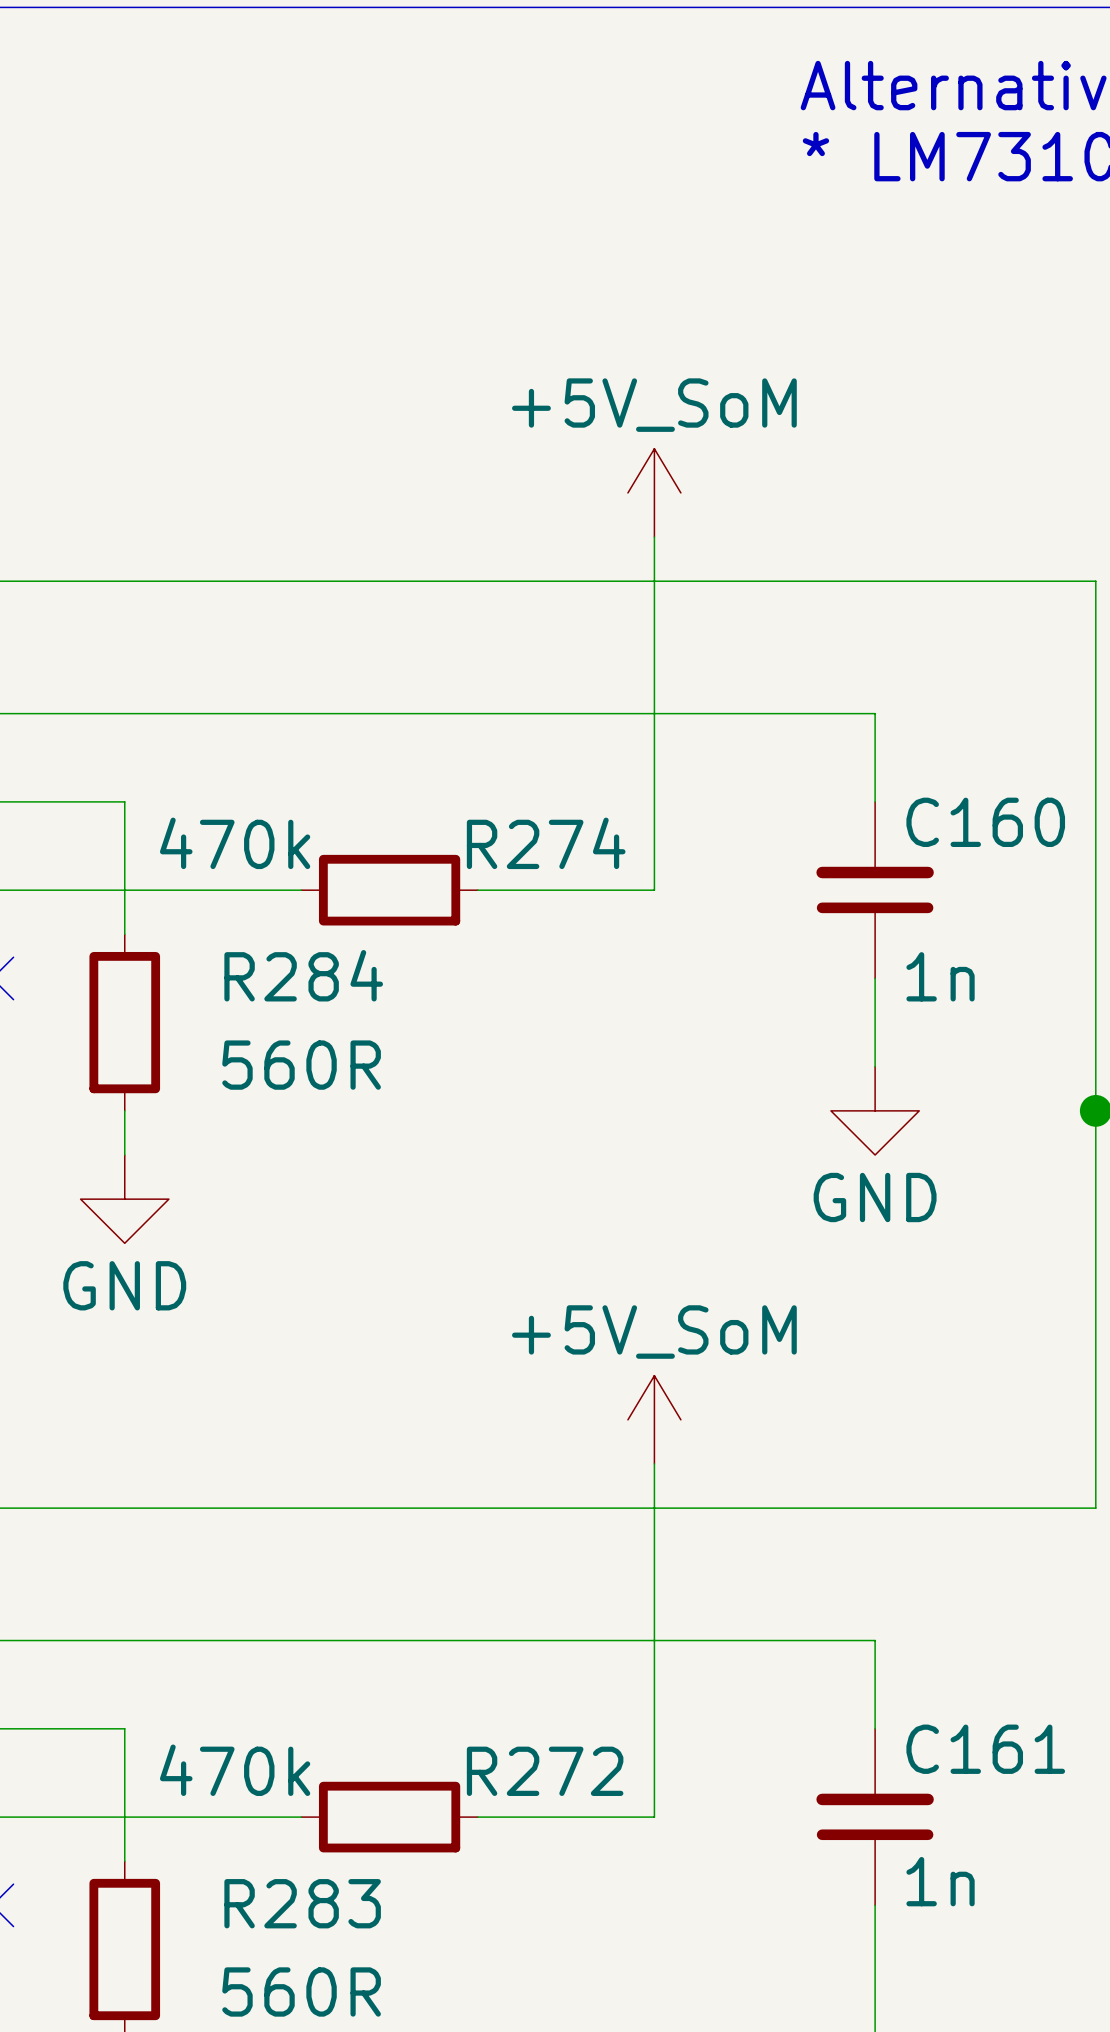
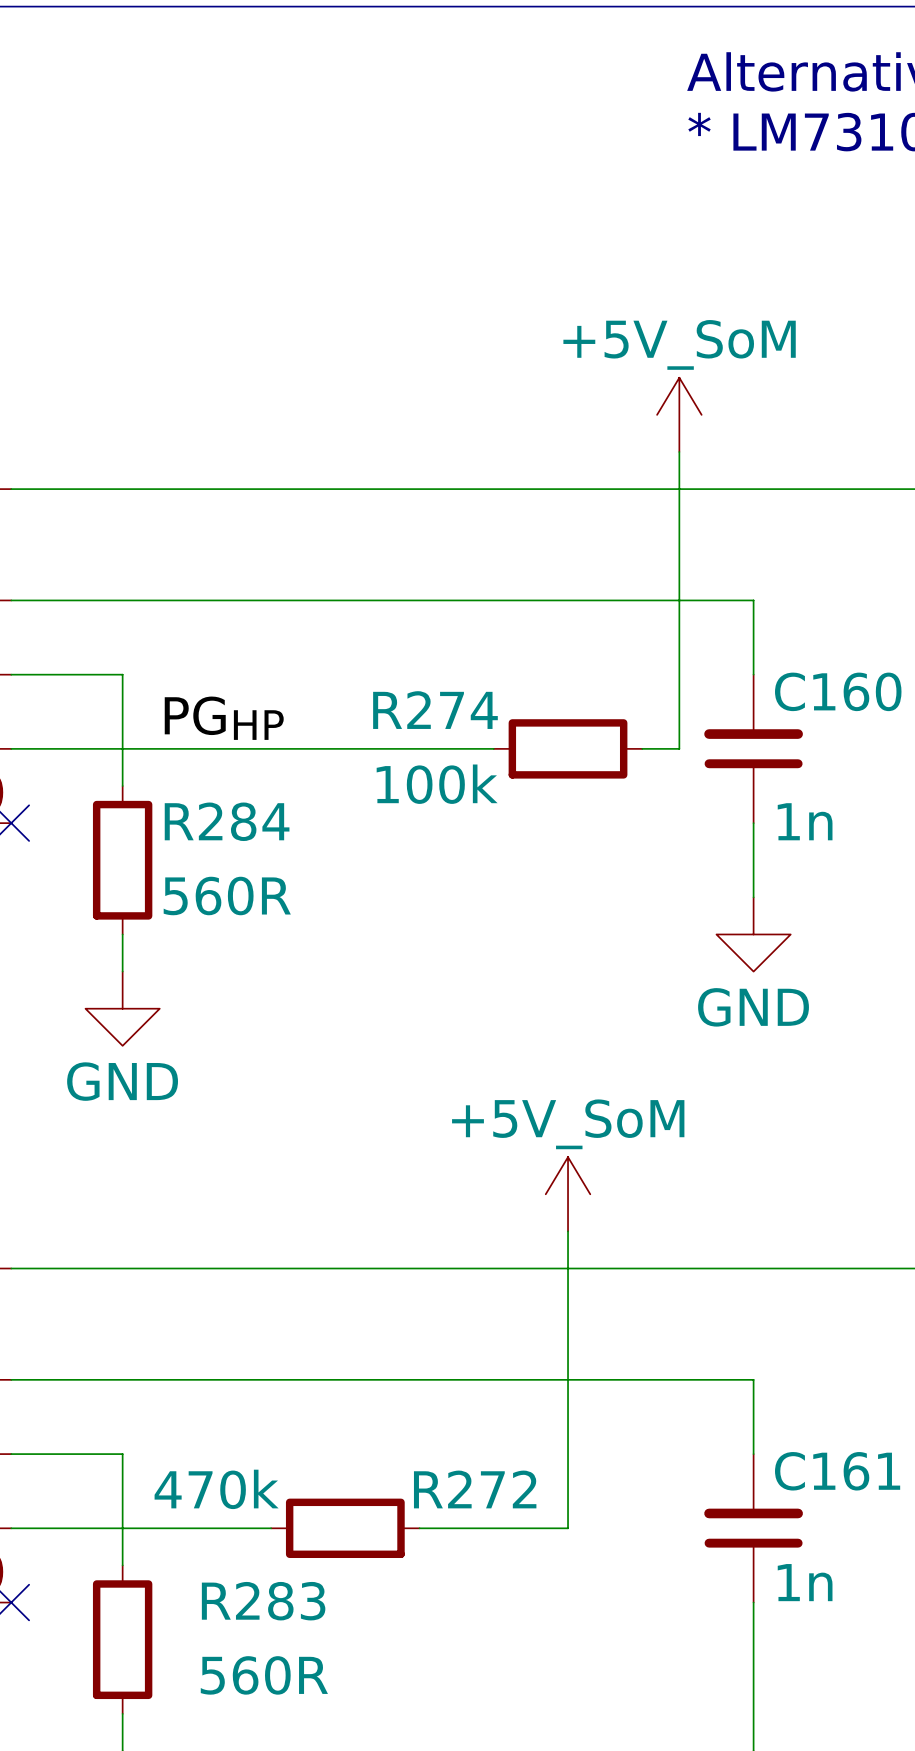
power symbol position: +5V_SoM (654, 492) -> +5V_SoM (679, 414)
wire: (654, 537) (654, 890) (566, 890) -> none
wire: none -> (679, 451) (679, 748) (642, 748)
R274 text: 470k (235, 843) -> 100k (437, 784)
R274 name position: R274 (546, 843) -> R274 (435, 710)
label: none -> PGHP (224, 718)
wire: none -> (271, 748) (419, 748)
R274 position: (389, 890) -> (568, 748)
R284 name position: R284 (303, 975) -> R284 (227, 821)
R284 text position: 560R (301, 1065) -> 560R (227, 896)

